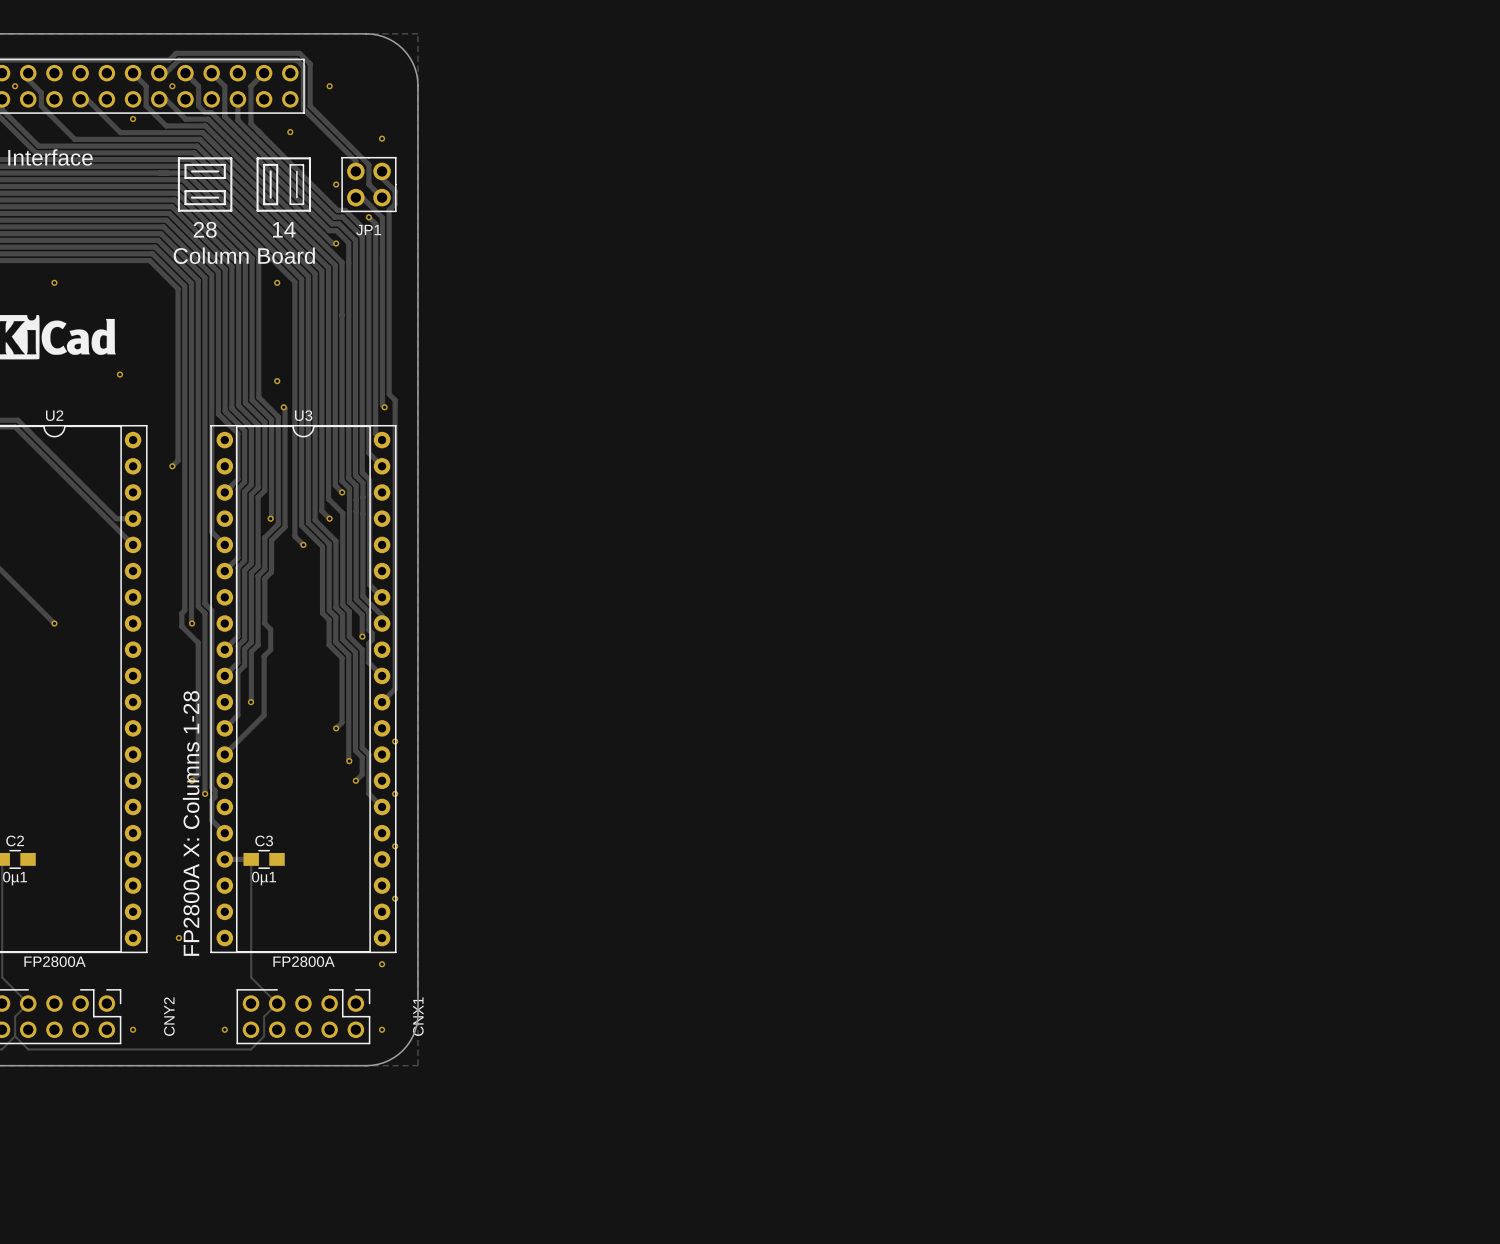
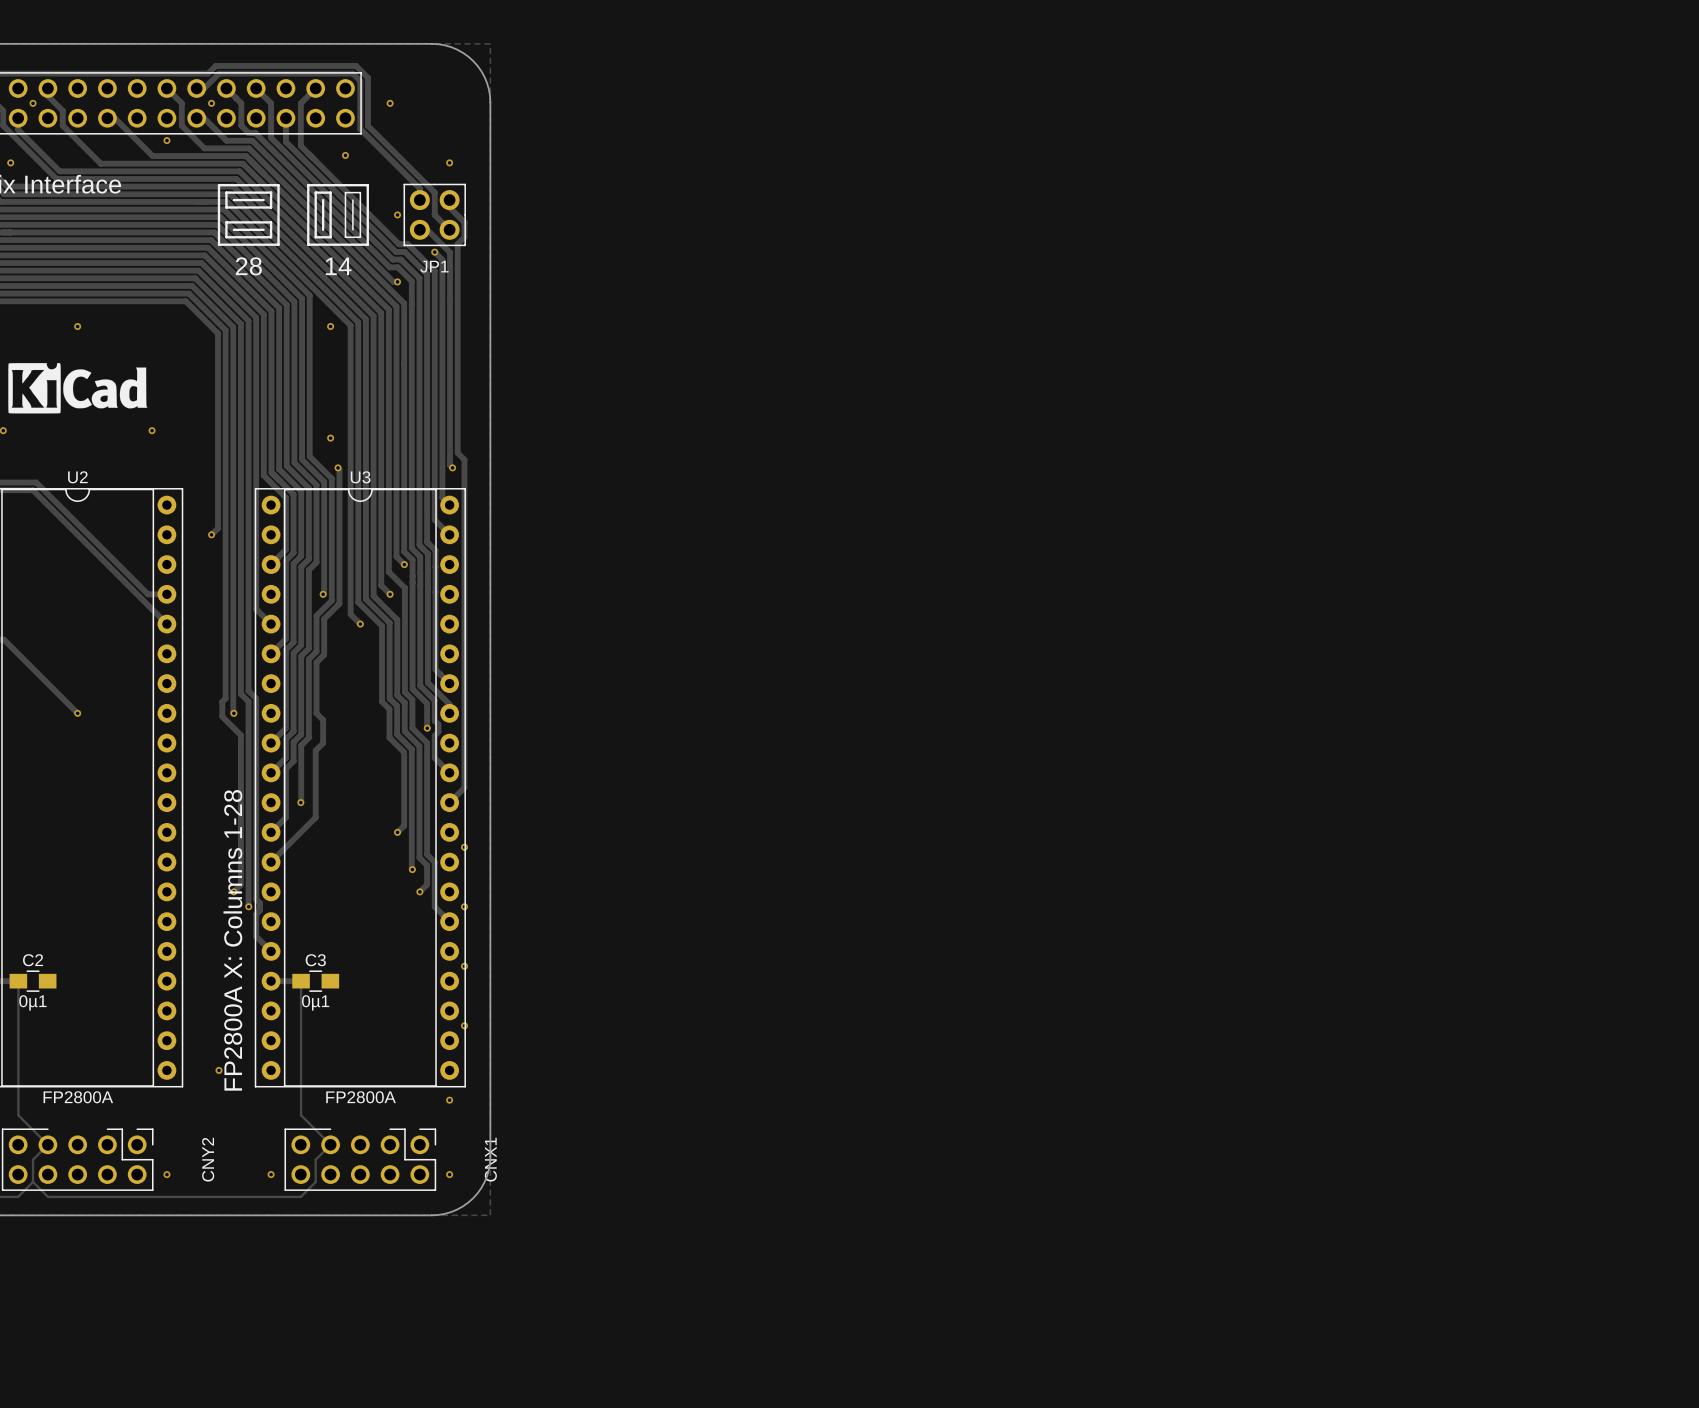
text: Column Board (244, 255) -> none

